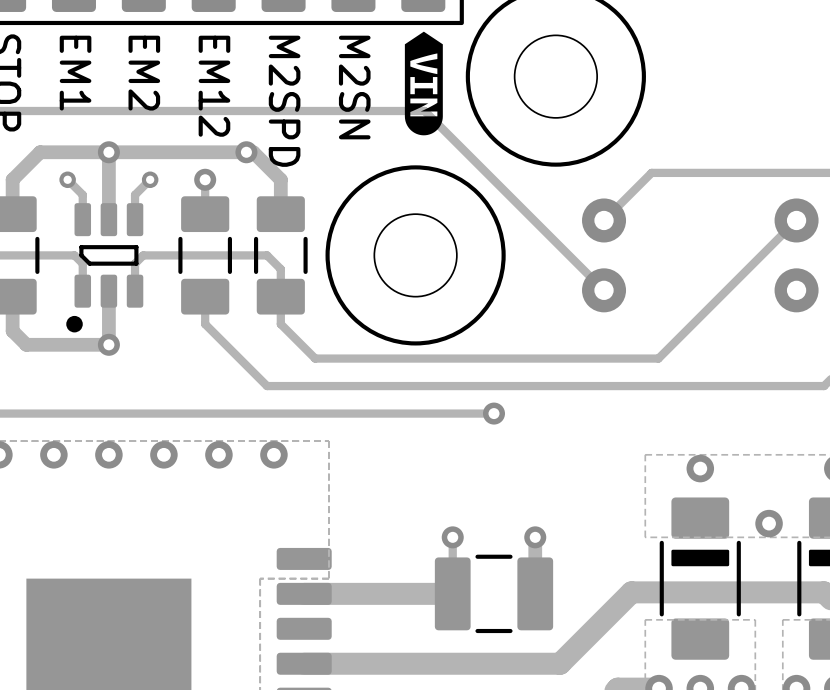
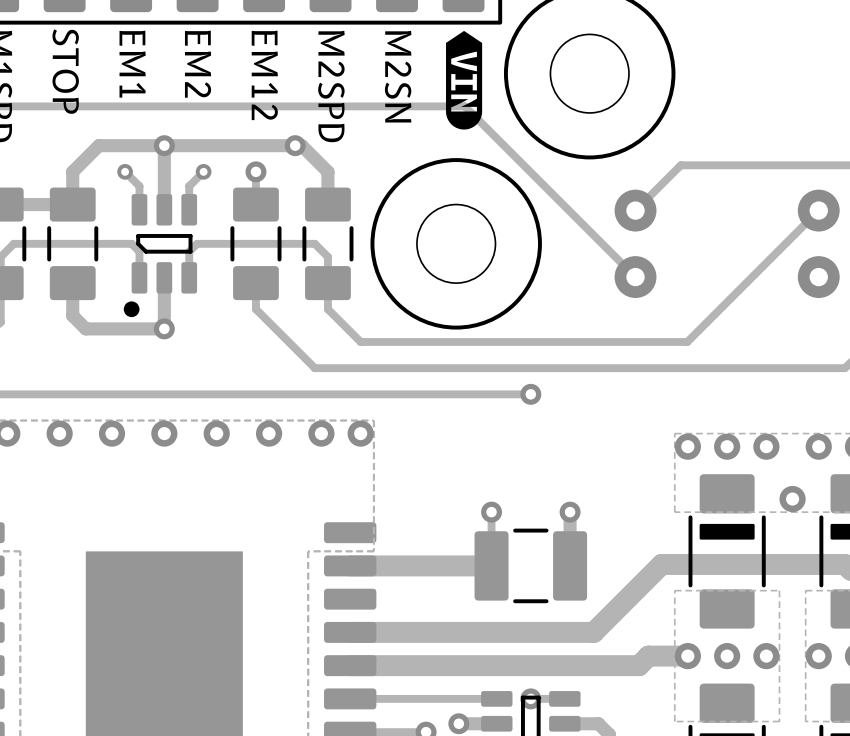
via: none -> (360, 433)
via: none -> (687, 446)
via: none -> (766, 446)
via: none -> (818, 446)

